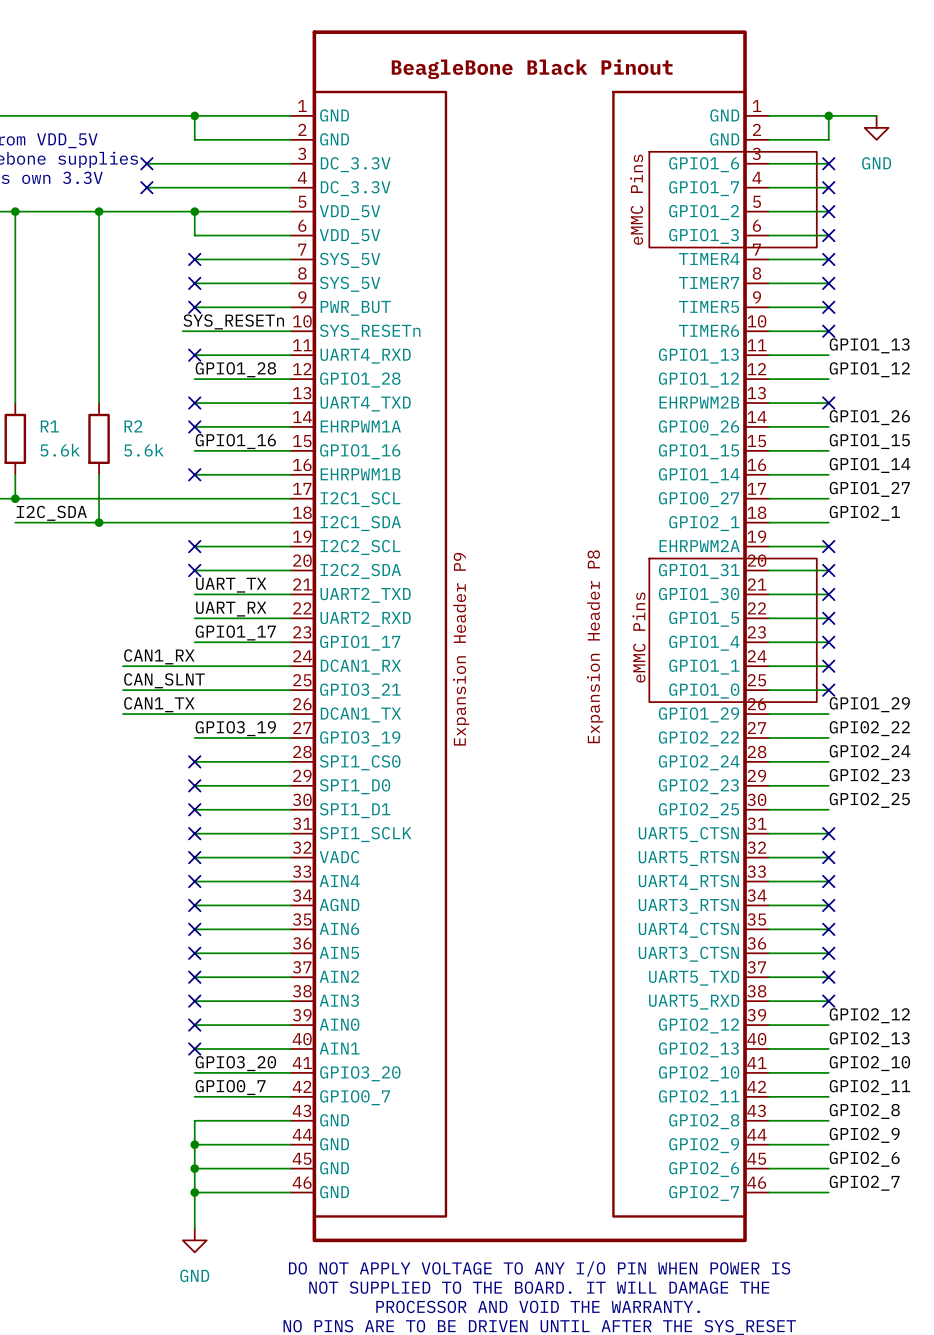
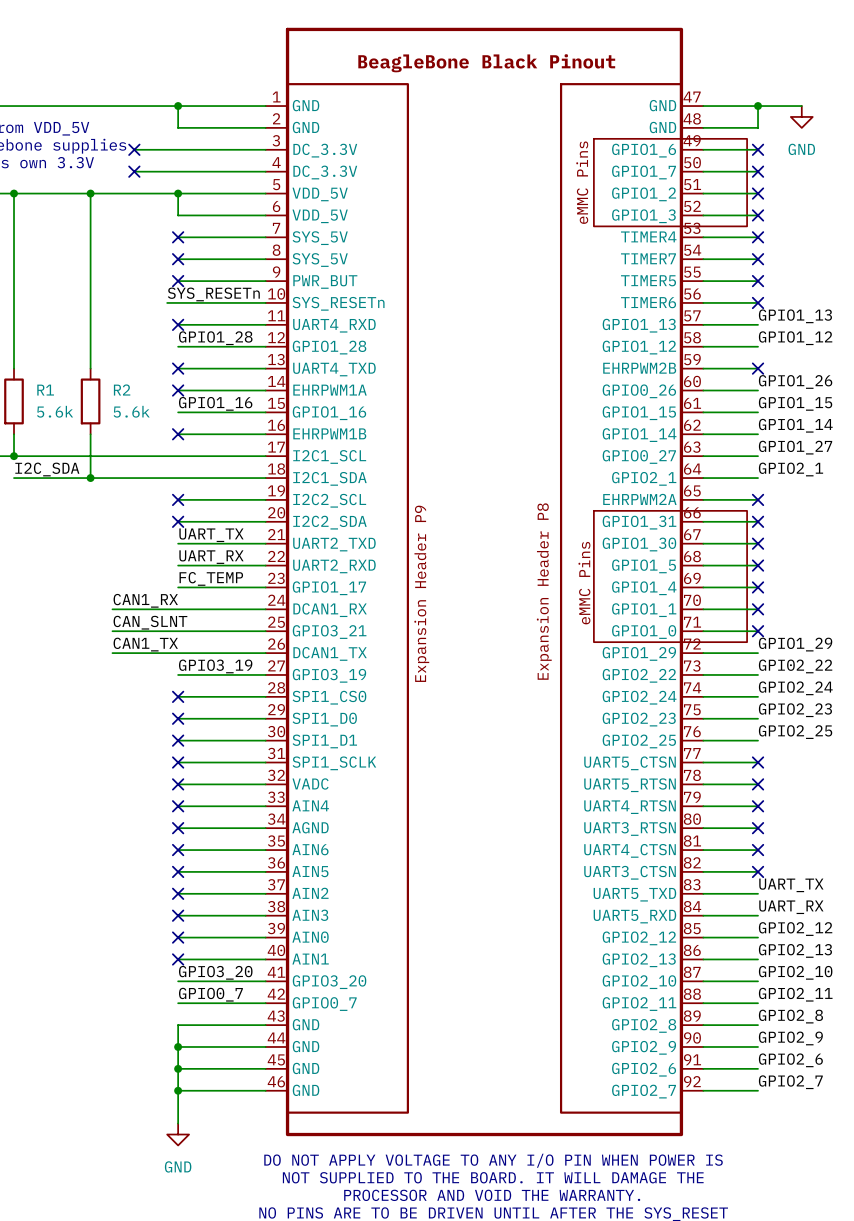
part symbol: [290, 30, 817, 1243] -> [265, 27, 748, 1137]
label: GPIO1_17 (235, 632) -> FC_TEMP (211, 578)
label: none -> UART_TX (791, 885)
no-connect mark: (828, 977) -> none
label: none -> UART_RX (791, 907)
no-connect mark: (828, 1001) -> none

